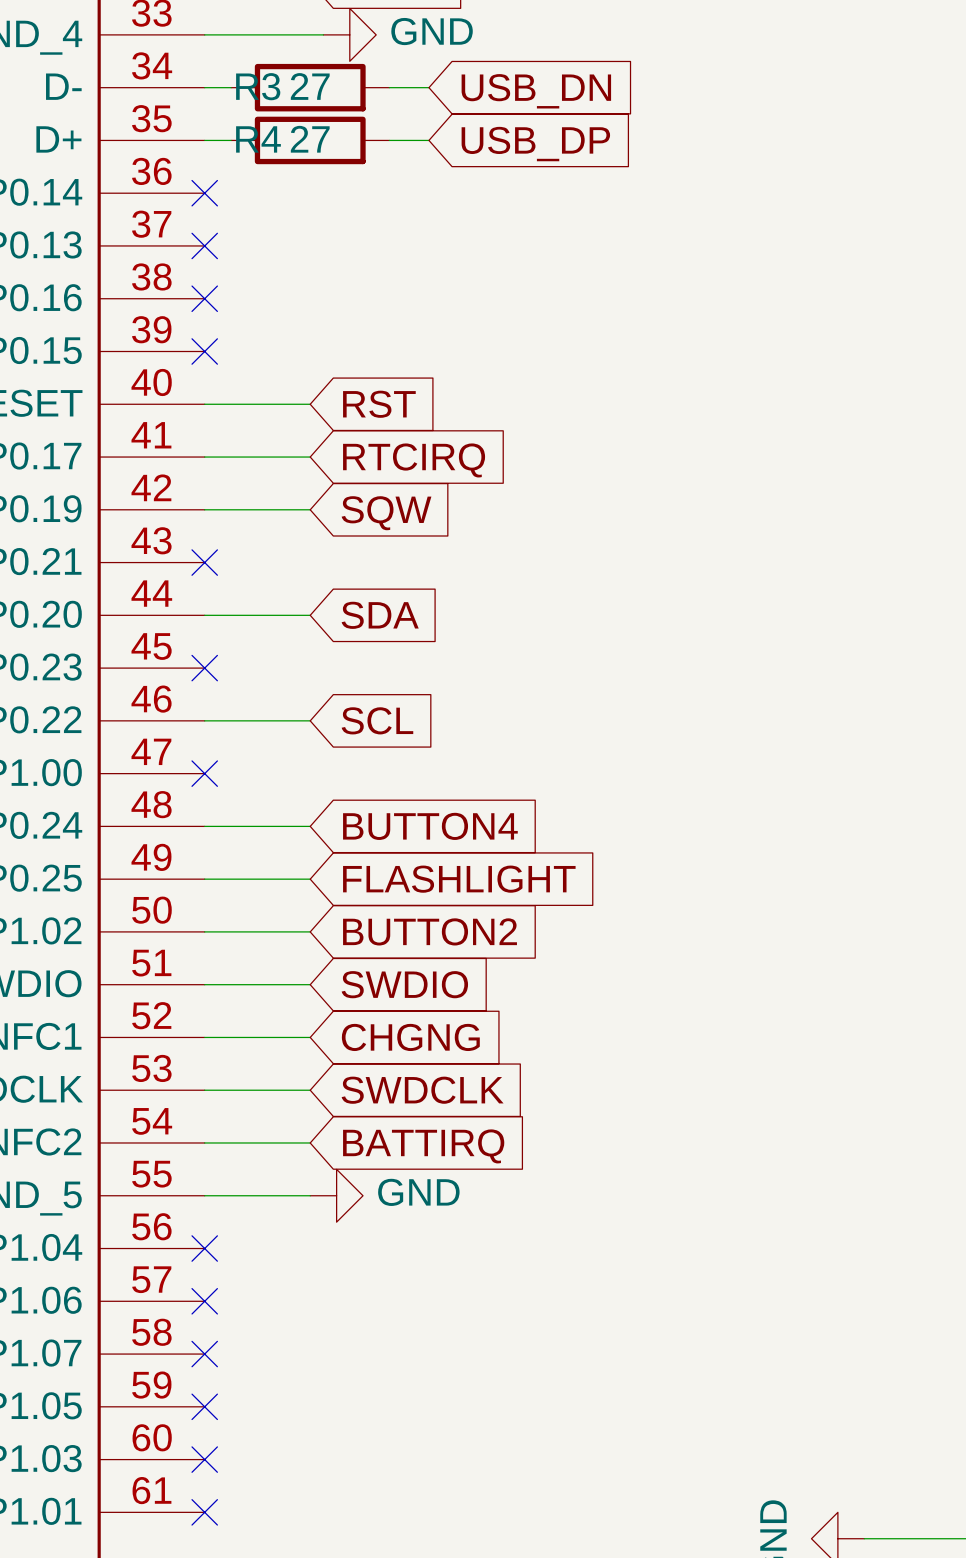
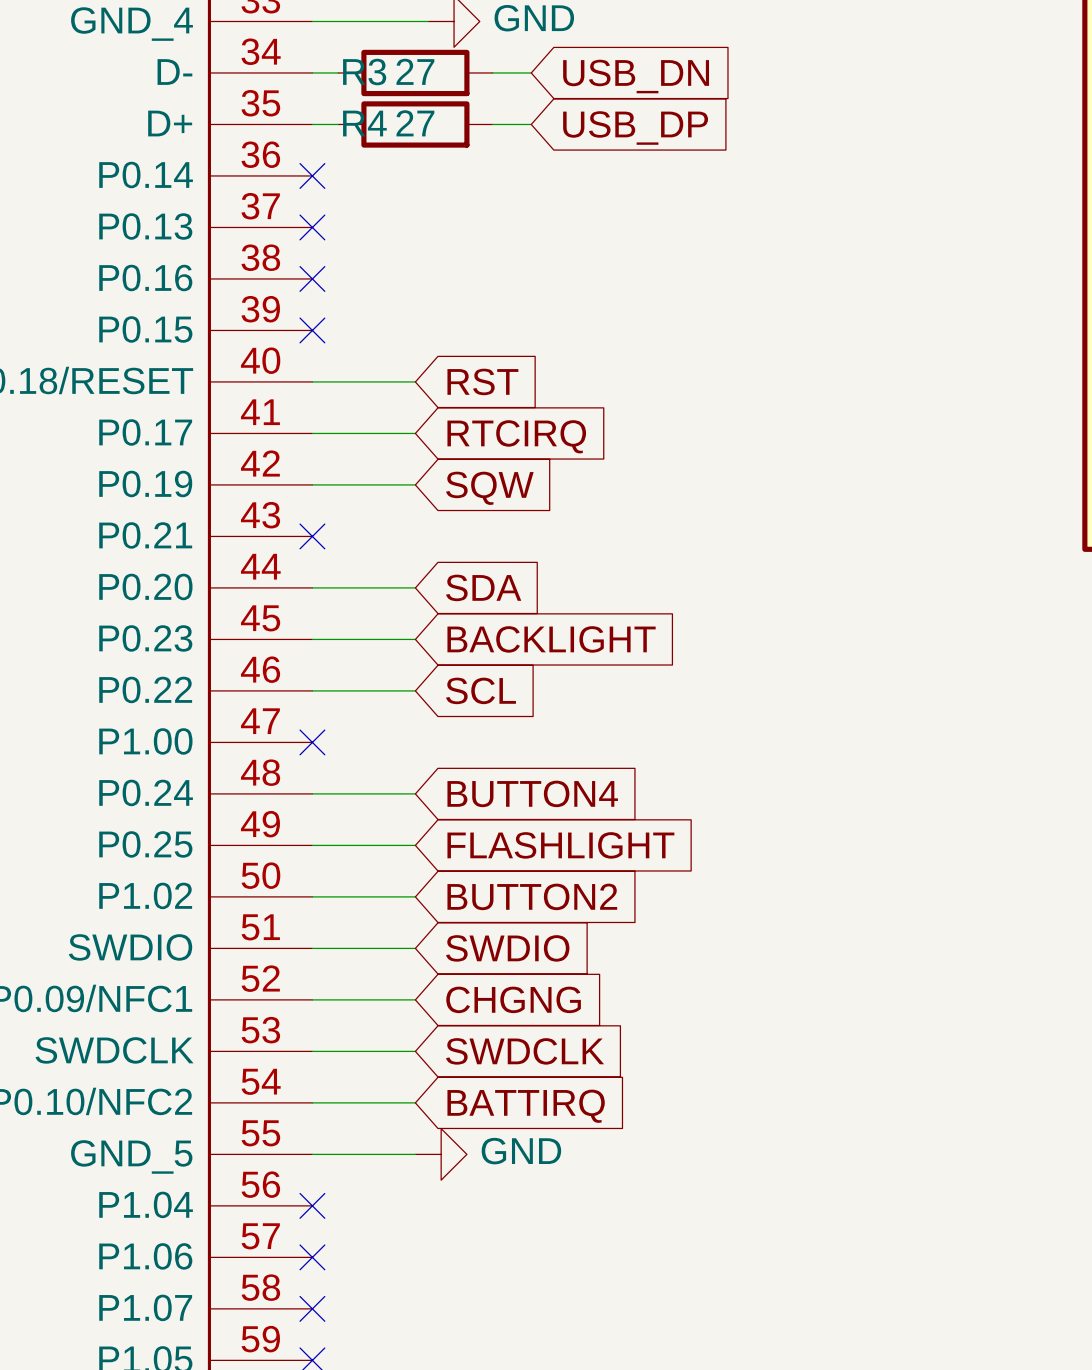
wire: none -> (312, 639) (415, 639)
no-connect mark: (204, 668) -> none
global label: none -> BACKLIGHT (551, 639)

